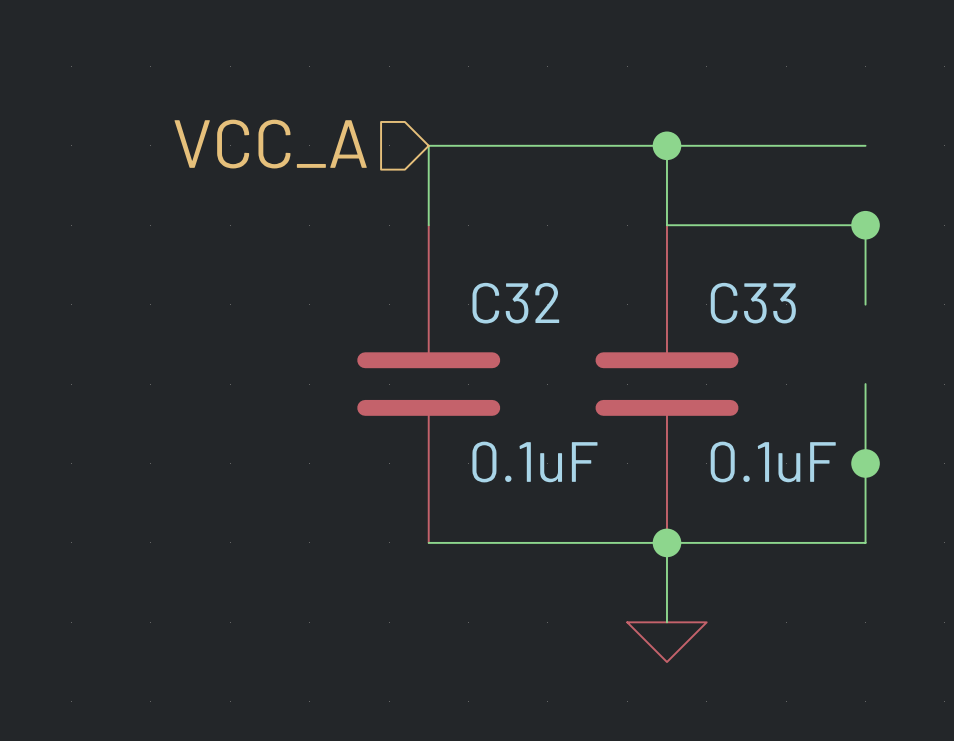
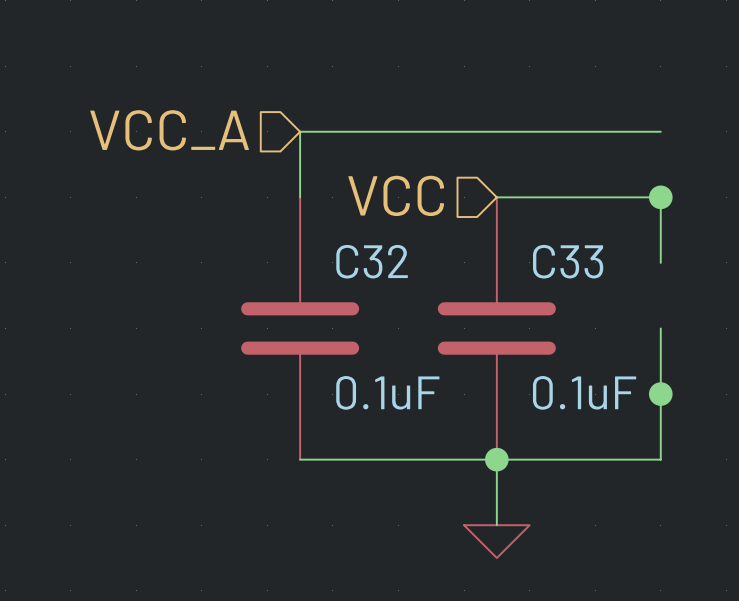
wire: (666, 145) (666, 225) -> none
junction: (666, 145) -> none
hierarchical label: none -> VCC (396, 195)

